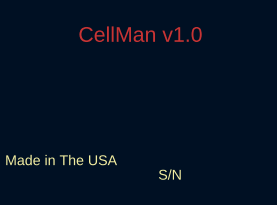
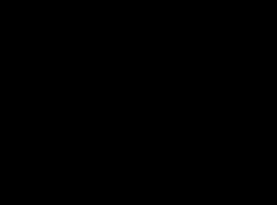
text: CellMan v1.0 (140, 34) -> none
text: Made in The USA (61, 160) -> none
text: S/N (169, 174) -> none

